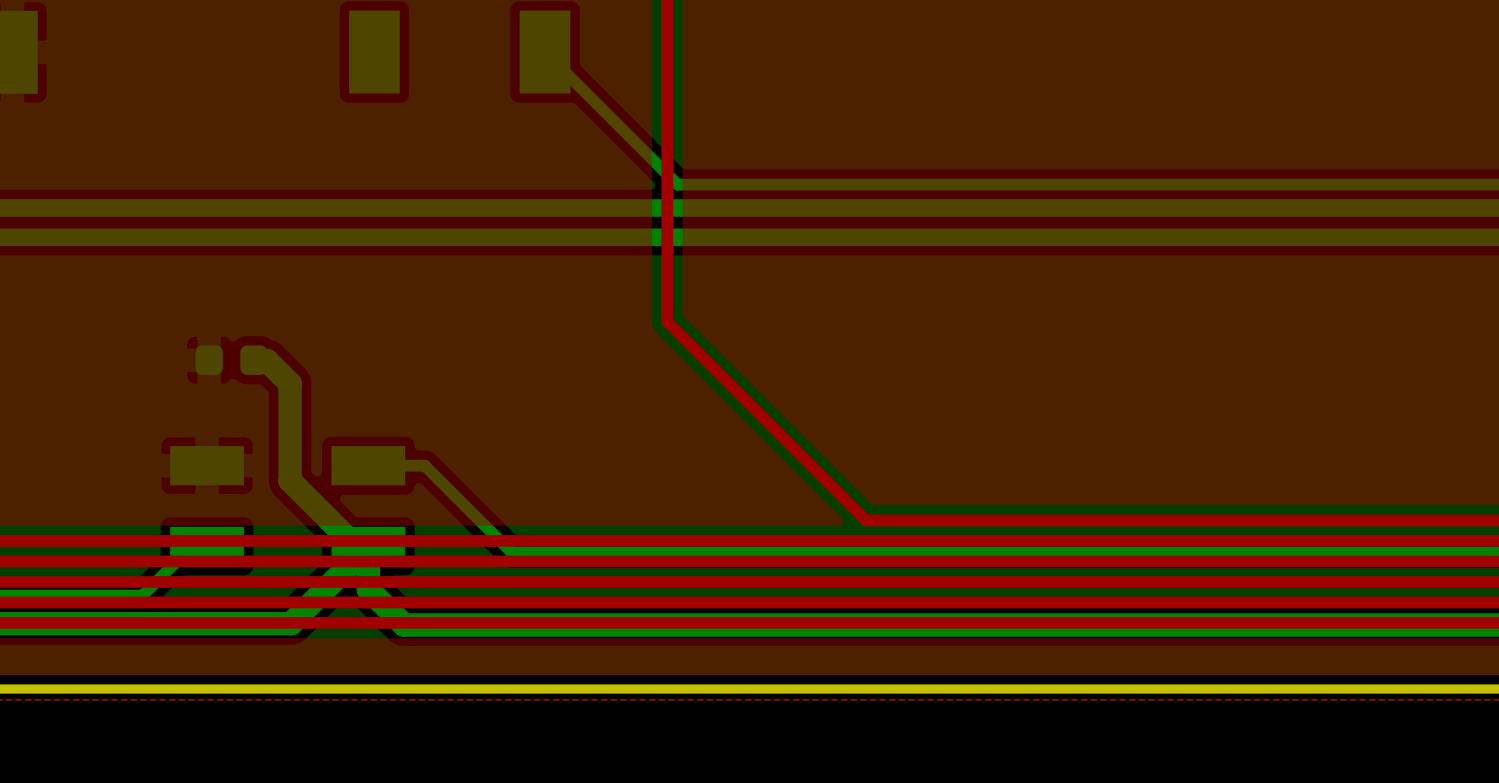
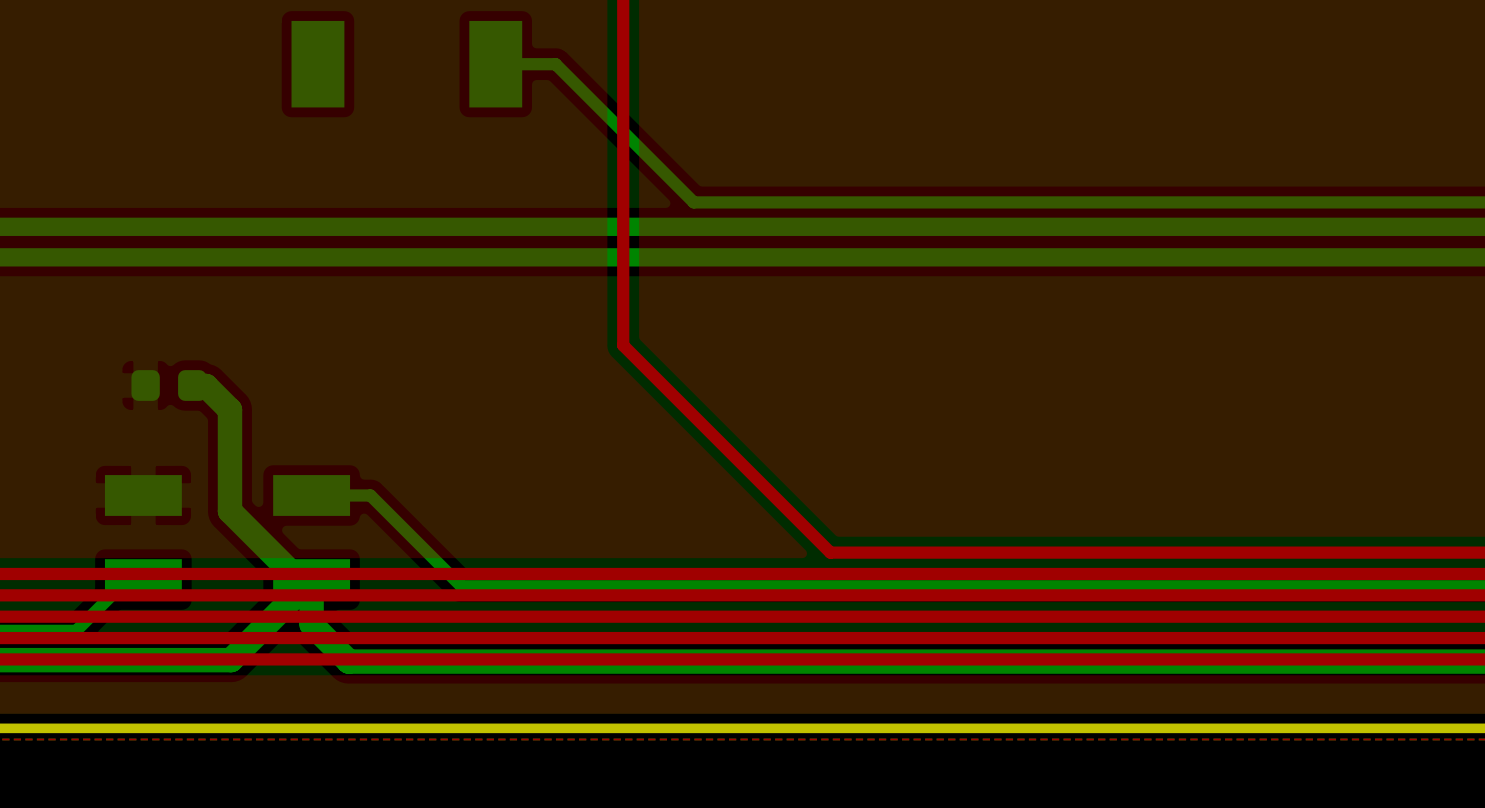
bottom track: (544, 52) (677, 184) (734, 184) -> (495, 64) (555, 64) (693, 202)

